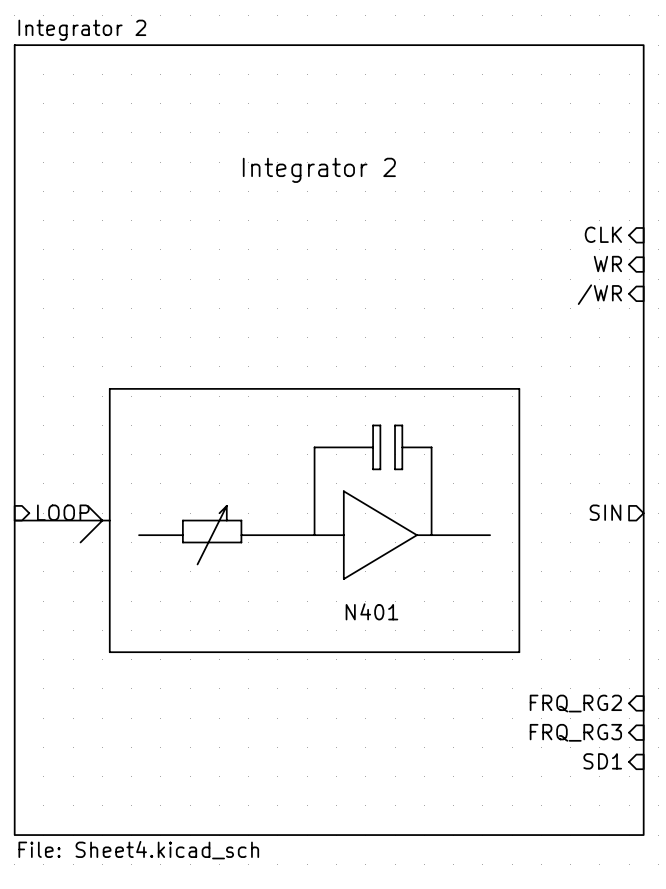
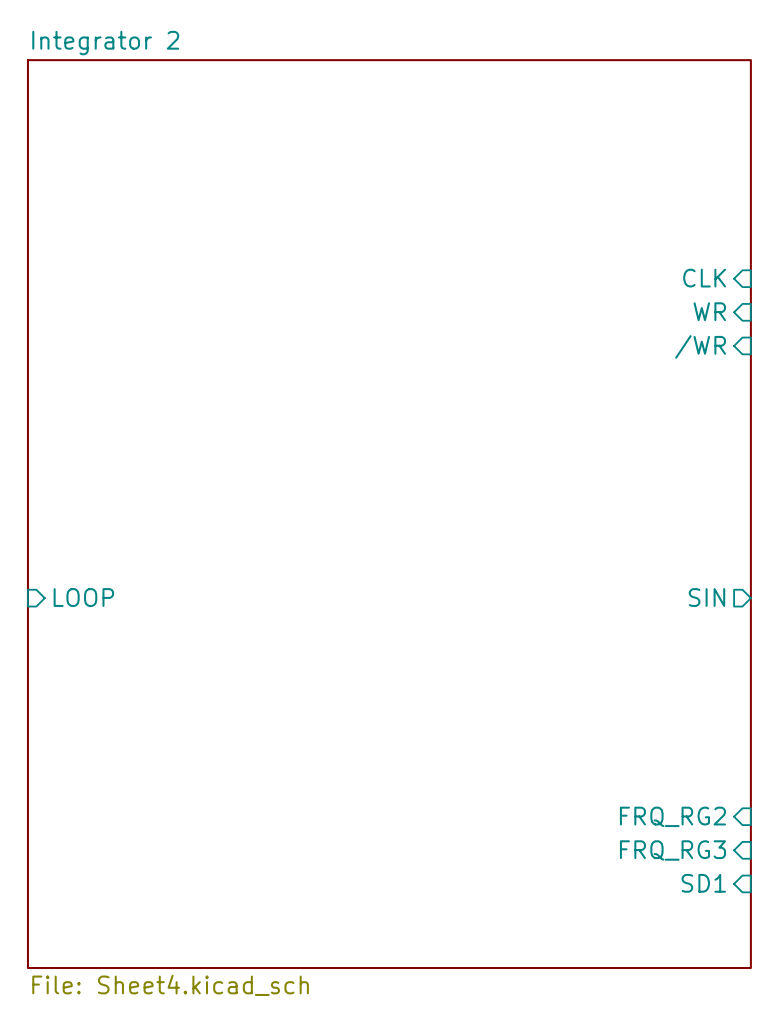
text: Integrator 2 (319, 170) -> none
line: (109, 388) (519, 388) (519, 652) (109, 652) (109, 388) -> none
line: (373, 425) (373, 469) (380, 469) (380, 425) (373, 425) -> none
line: (395, 425) (395, 469) (402, 469) (402, 425) (395, 425) -> none
line: (373, 447) (314, 447) (314, 535) -> none
line: (402, 447) (431, 447) (431, 535) -> none
line: (87, 505) (102, 520) (80, 542) -> none
line: (226, 505) (219, 513) -> none
line: (226, 505) (226, 520) -> none
line: (226, 505) (197, 564) -> none
line: (14, 520) (109, 520) -> none
line: (182, 520) (182, 542) (241, 542) (241, 520) (182, 520) -> none
line: (139, 535) (182, 535) -> none
line: (241, 535) (343, 535) -> none
line: (416, 535) (490, 535) -> none
line: (416, 535) (343, 491) (343, 579) (416, 535) -> none
text: N401 (371, 611) -> none

